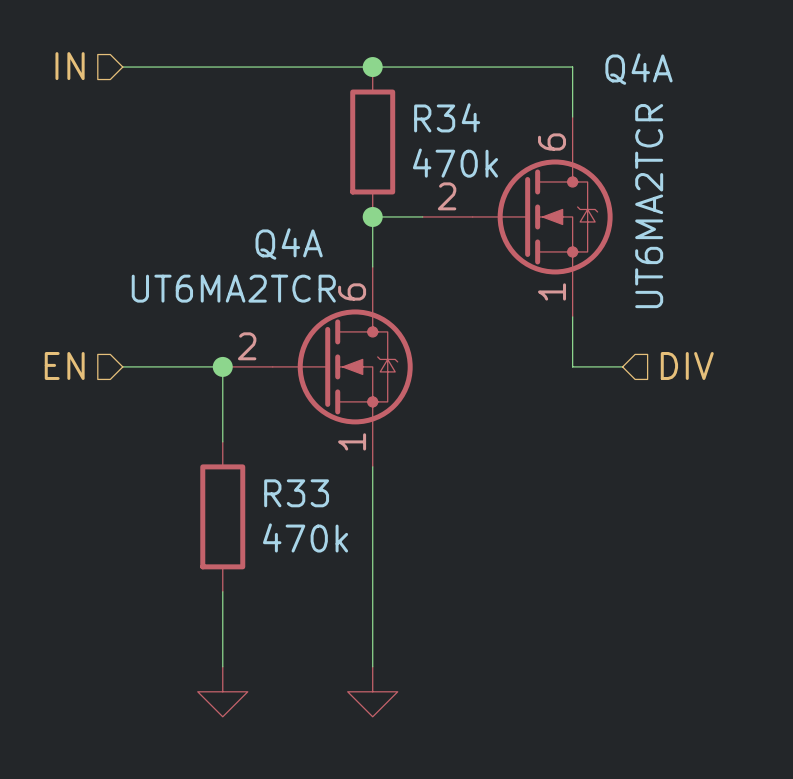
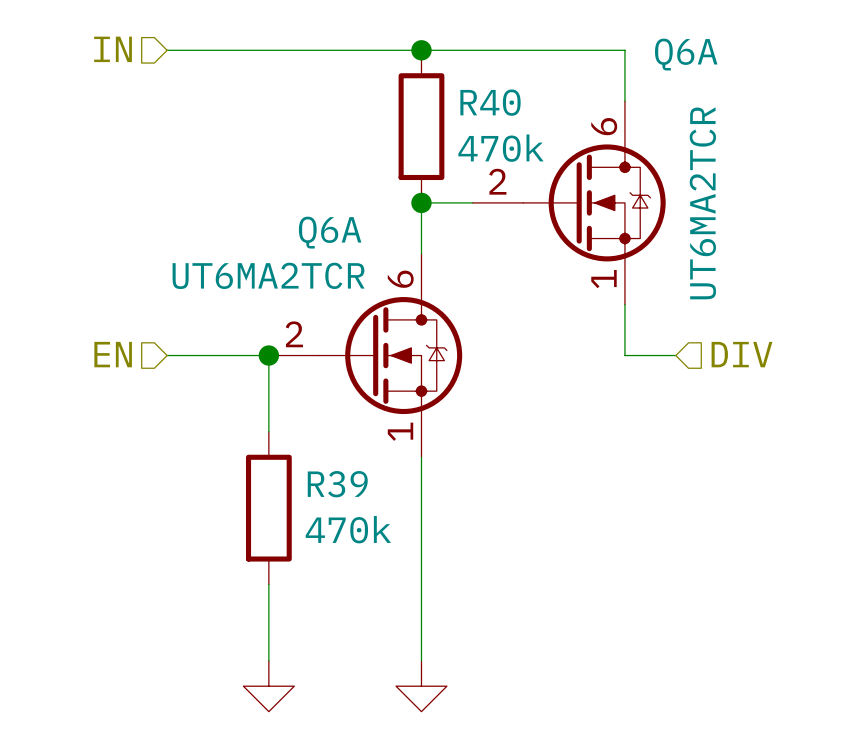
Q4A name: Q4A (638, 69) -> Q6A (686, 54)
R34 name: R34 (447, 117) -> R40 (490, 102)
Q4A name: Q4A (289, 244) -> Q6A (330, 232)
R33 name: R33 (296, 493) -> R39 (337, 484)

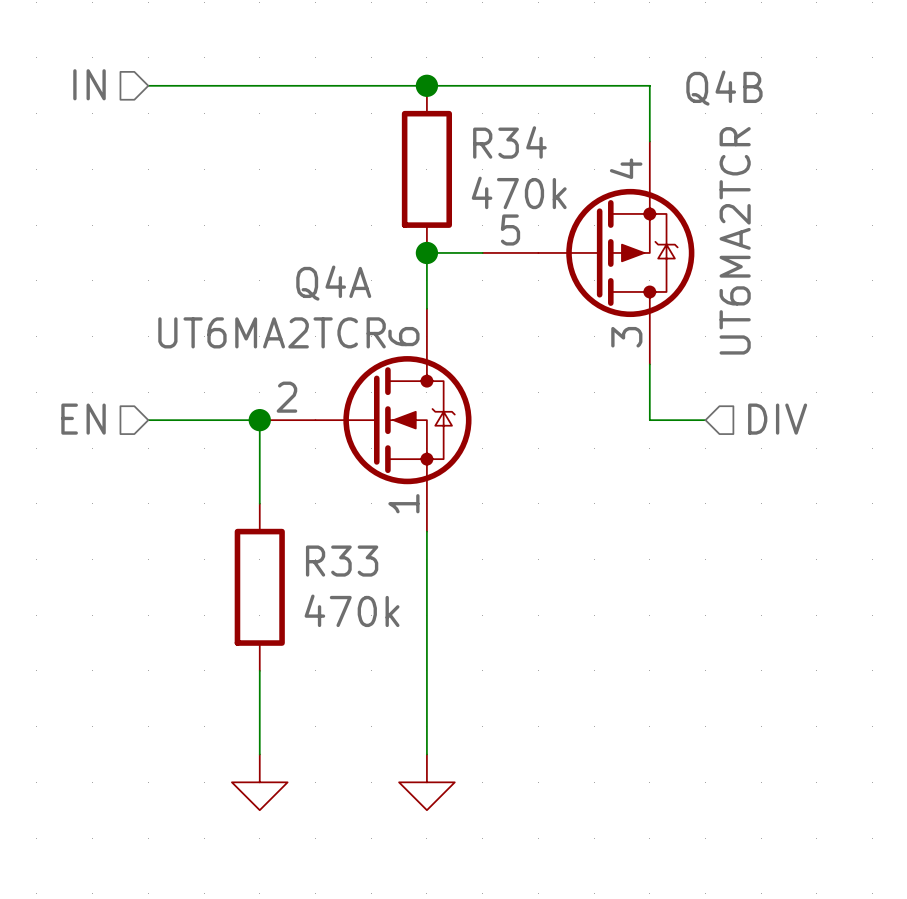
R40 name: R40 (490, 102) -> R34 (509, 142)
Q6A: UT6MA2TCR (569, 202) -> none
Q4B: none -> UT6MA2TCR (588, 252)
Q6A name: Q6A (330, 232) -> Q4A (333, 283)
R39 name: R39 (337, 484) -> R33 (342, 561)

